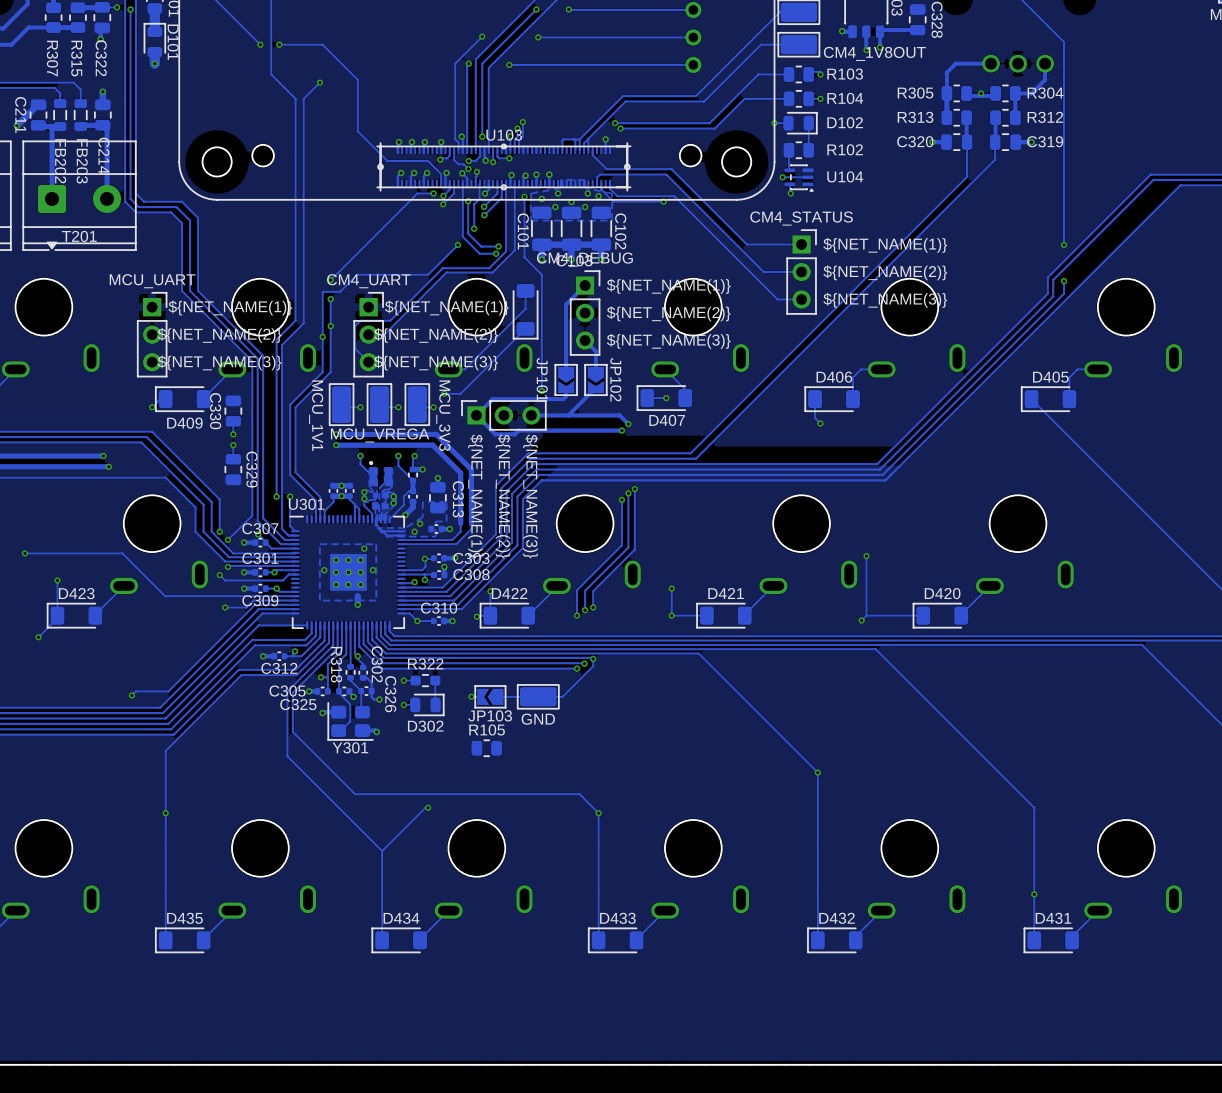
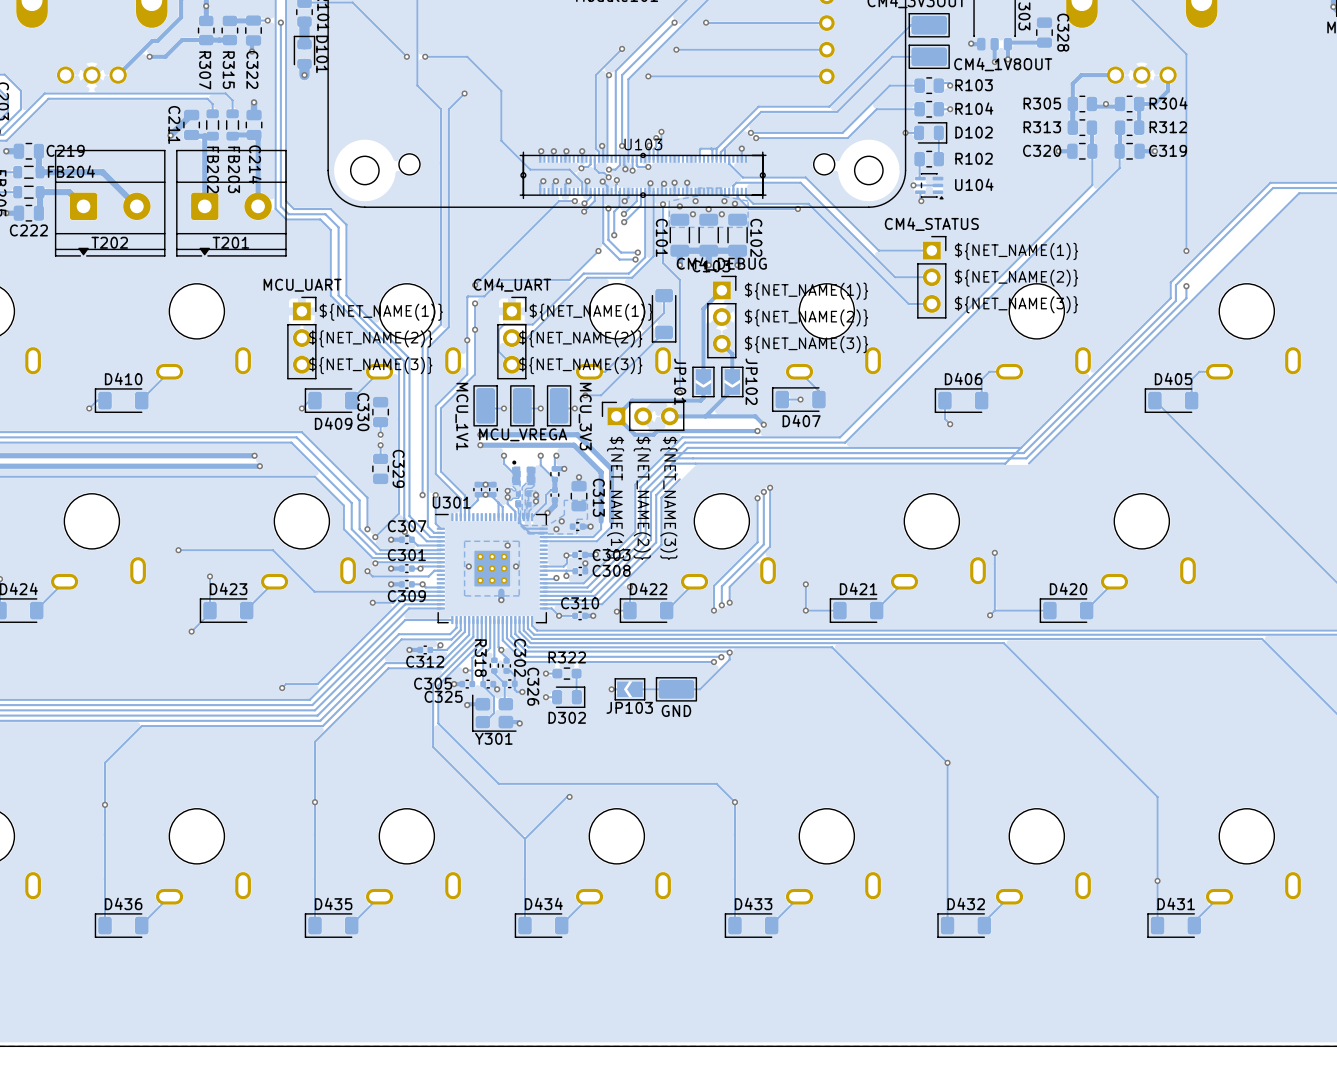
track: (706, 437) (690, 453) -> (839, 437) (682, 437) (666, 453)
track: (712, 442) (696, 458) -> (845, 442) (685, 442) (669, 458)
track: none -> (1021, 447) (687, 447) (671, 463)
track: (896, 453) (880, 469) (536, 469) -> (1023, 453) (824, 453)
track: (898, 458) (882, 474) (539, 474) -> (1026, 458) (829, 458)
track: (901, 464) (885, 480) (541, 480) -> none
R105: (486, 748) -> none

